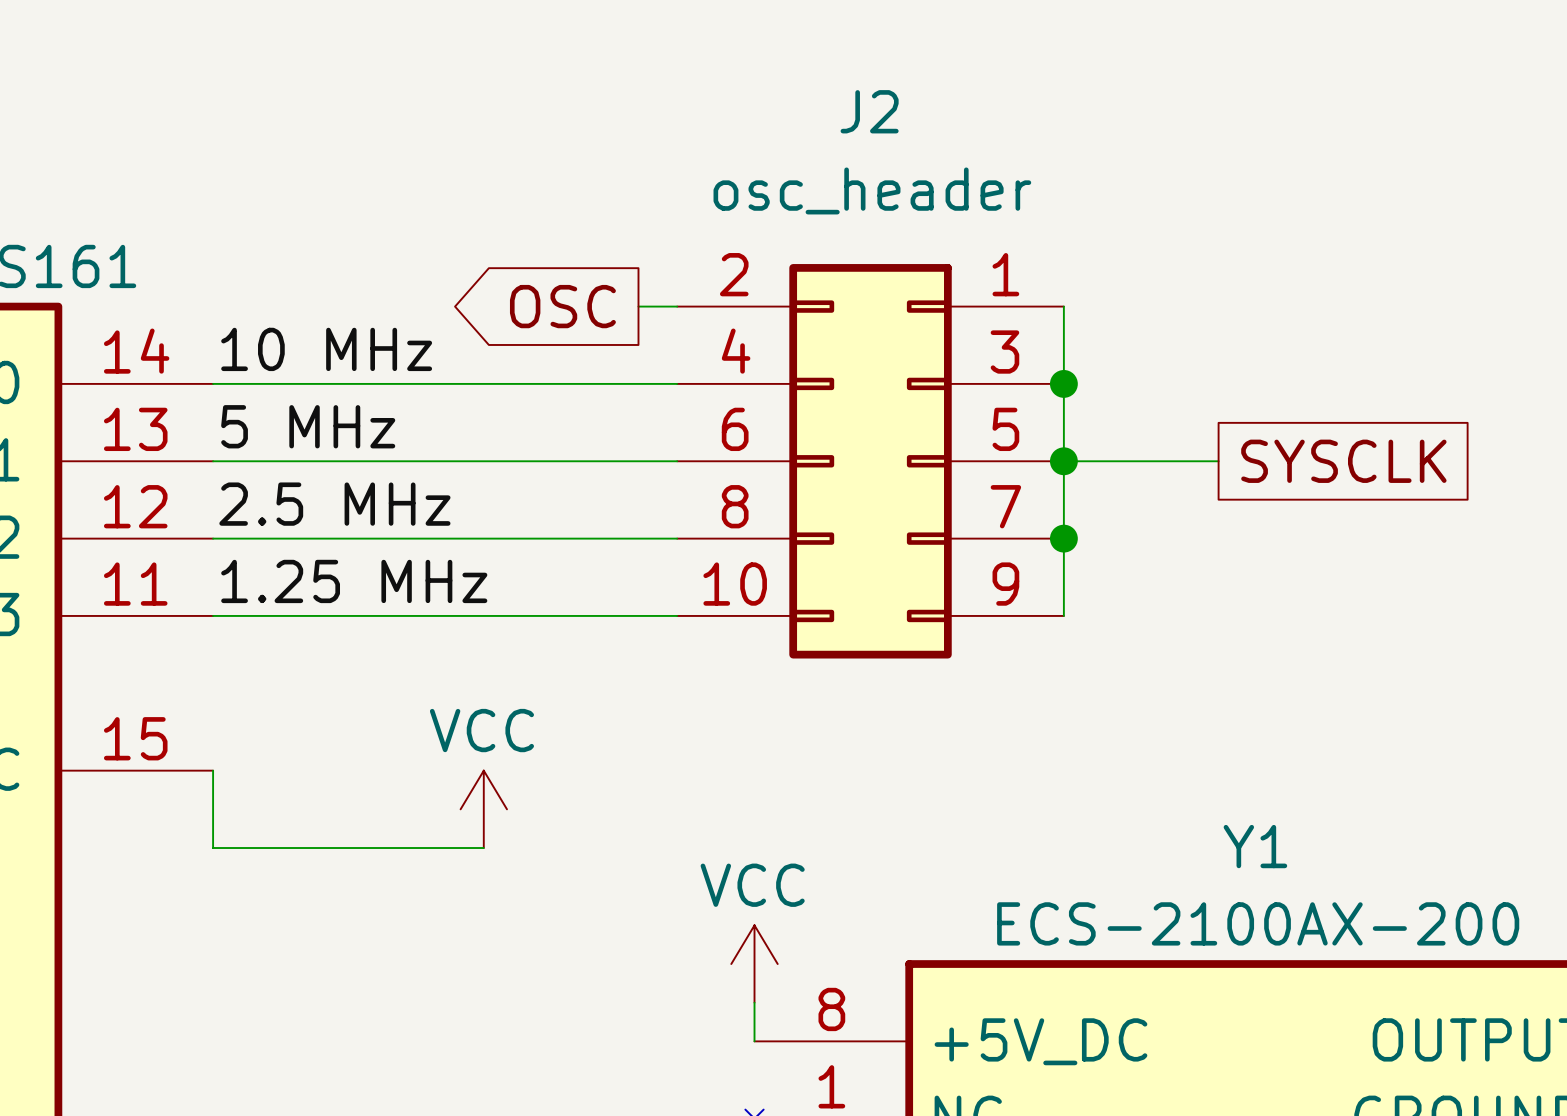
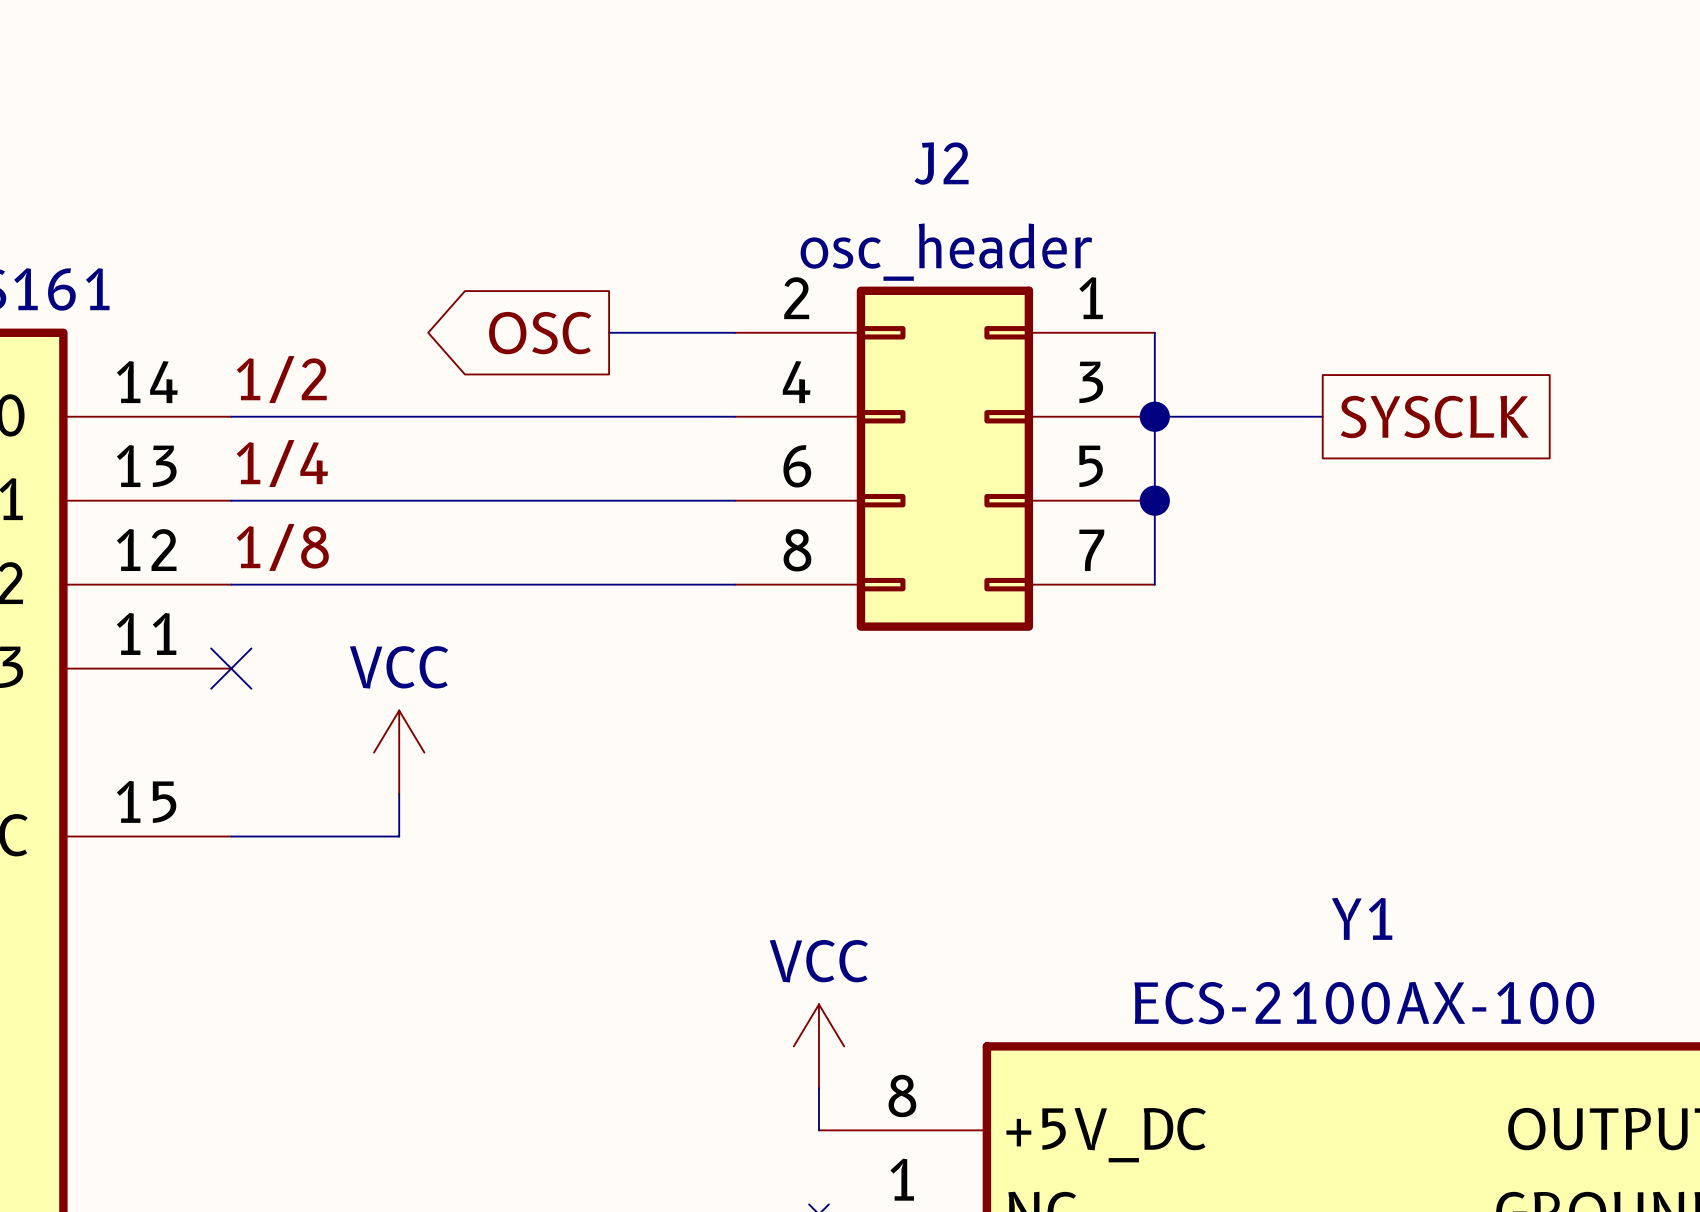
J2 name position: J2 (869, 111) -> J2 (941, 163)
J2 value position: osc_header (872, 190) -> osc_header (946, 252)
J2 symbol: [677, 264, 1064, 659] -> [735, 286, 1155, 631]
wire: none -> (609, 332) (693, 332)
global label position: OSC (562, 306) -> OSC (540, 333)
label: 10 MHz (326, 349) -> 1/2 (281, 379)
label: 5 MHz (308, 426) -> 1/4 (282, 463)
wire: (1063, 461) (1218, 461) -> (1154, 416) (1322, 416)
global label position: SYSCLK (1343, 461) -> SYSCLK (1434, 416)
label: 2.5 MHz (334, 504) -> 1/8 (282, 547)
wire: (1063, 538) (1063, 615) -> none
junction: (1063, 538) -> none
label: 1.25 MHz (354, 581) -> none
wire: (213, 615) (677, 615) -> none
no-connect mark: none -> (231, 668)
wire: (213, 770) (213, 848) (483, 848) -> (231, 836) (399, 836) (399, 794)
power symbol position: VCC (483, 809) -> VCC (399, 752)
Y1 value: ECS-2100AX-200 (1258, 923) -> ECS-2100AX-100 (1364, 1003)

